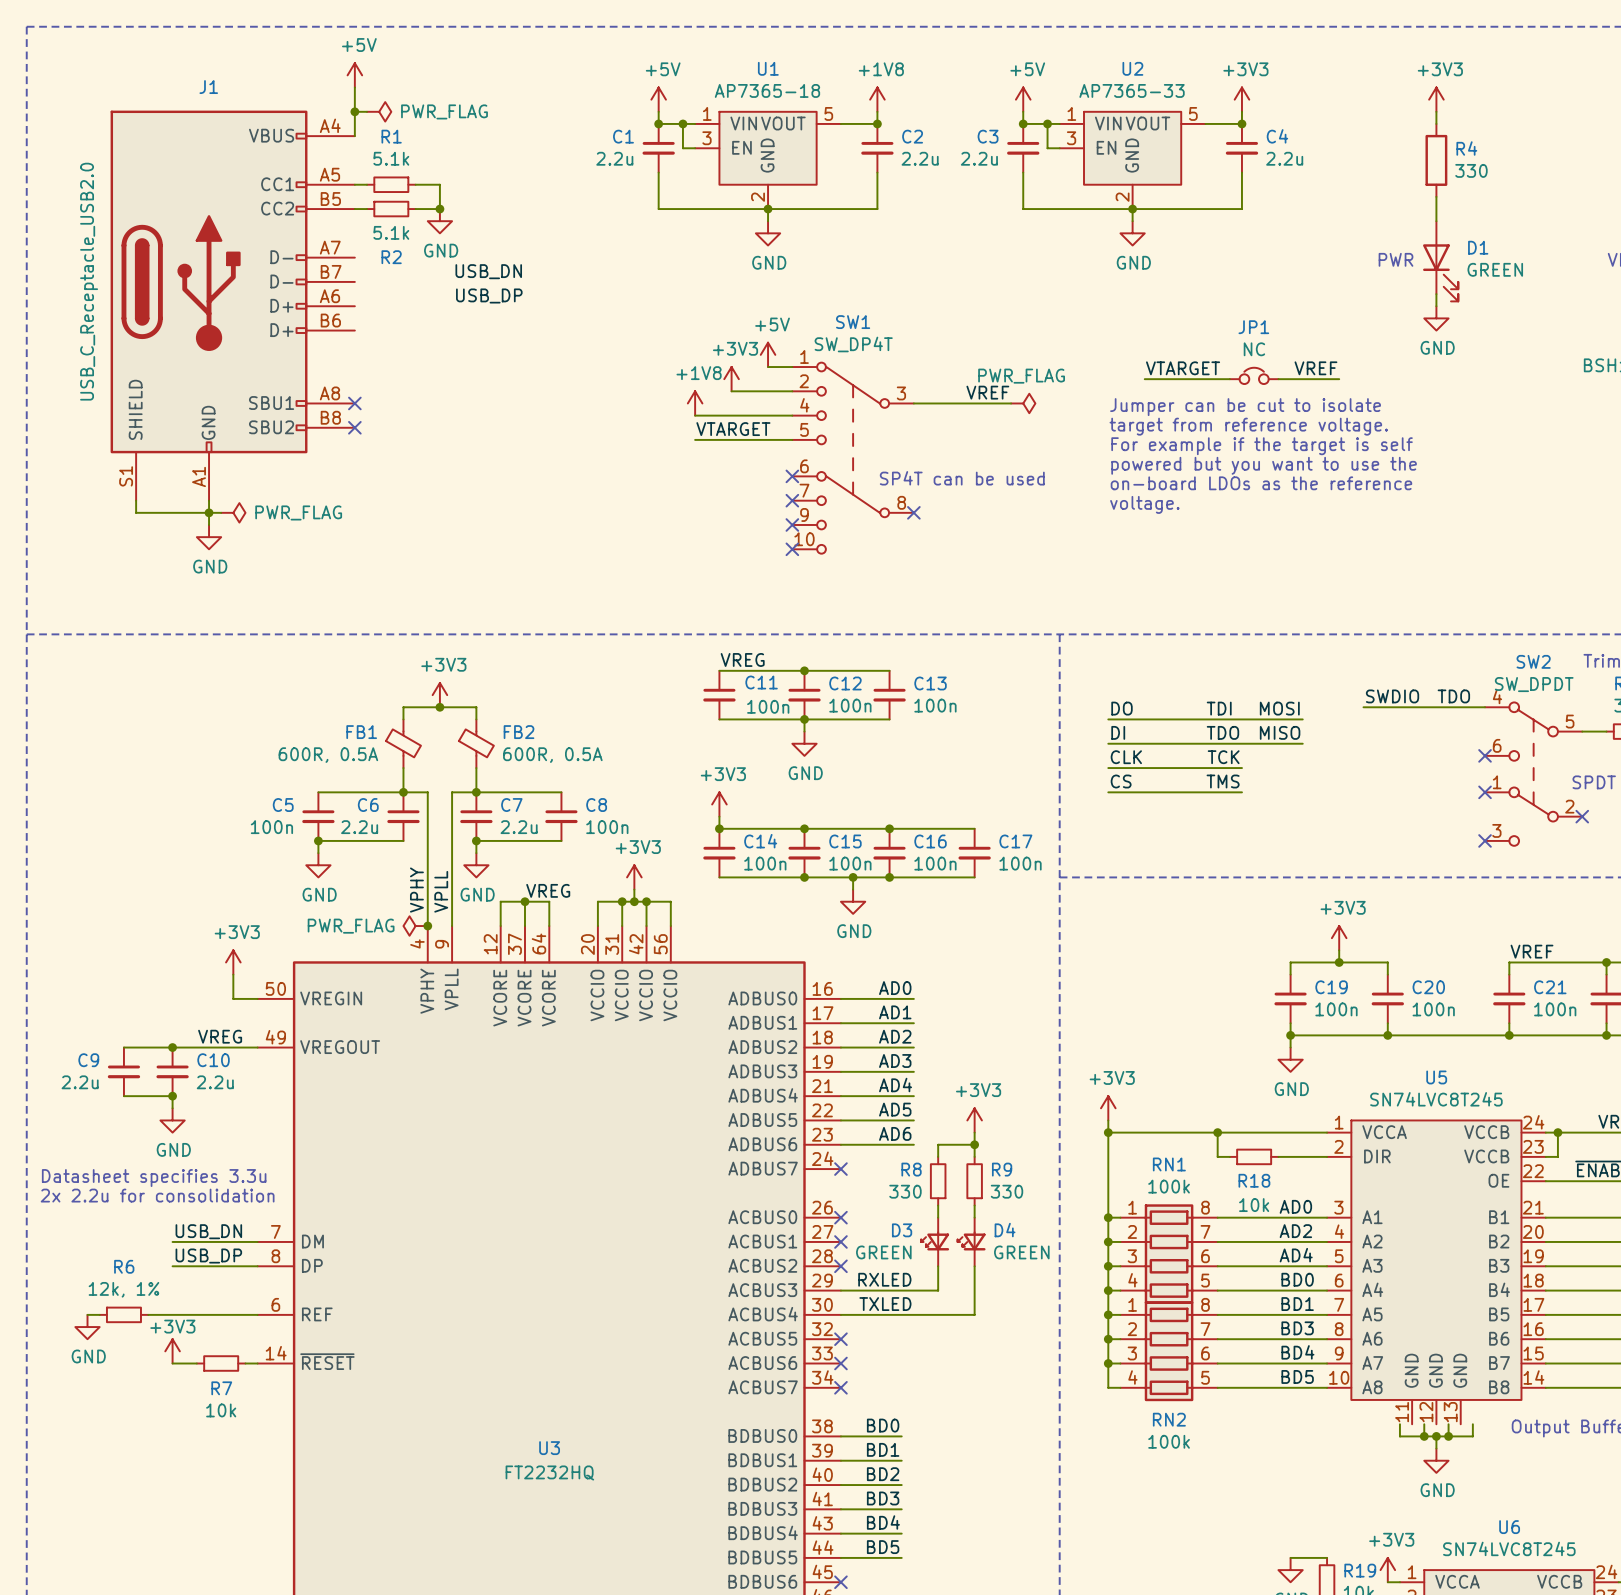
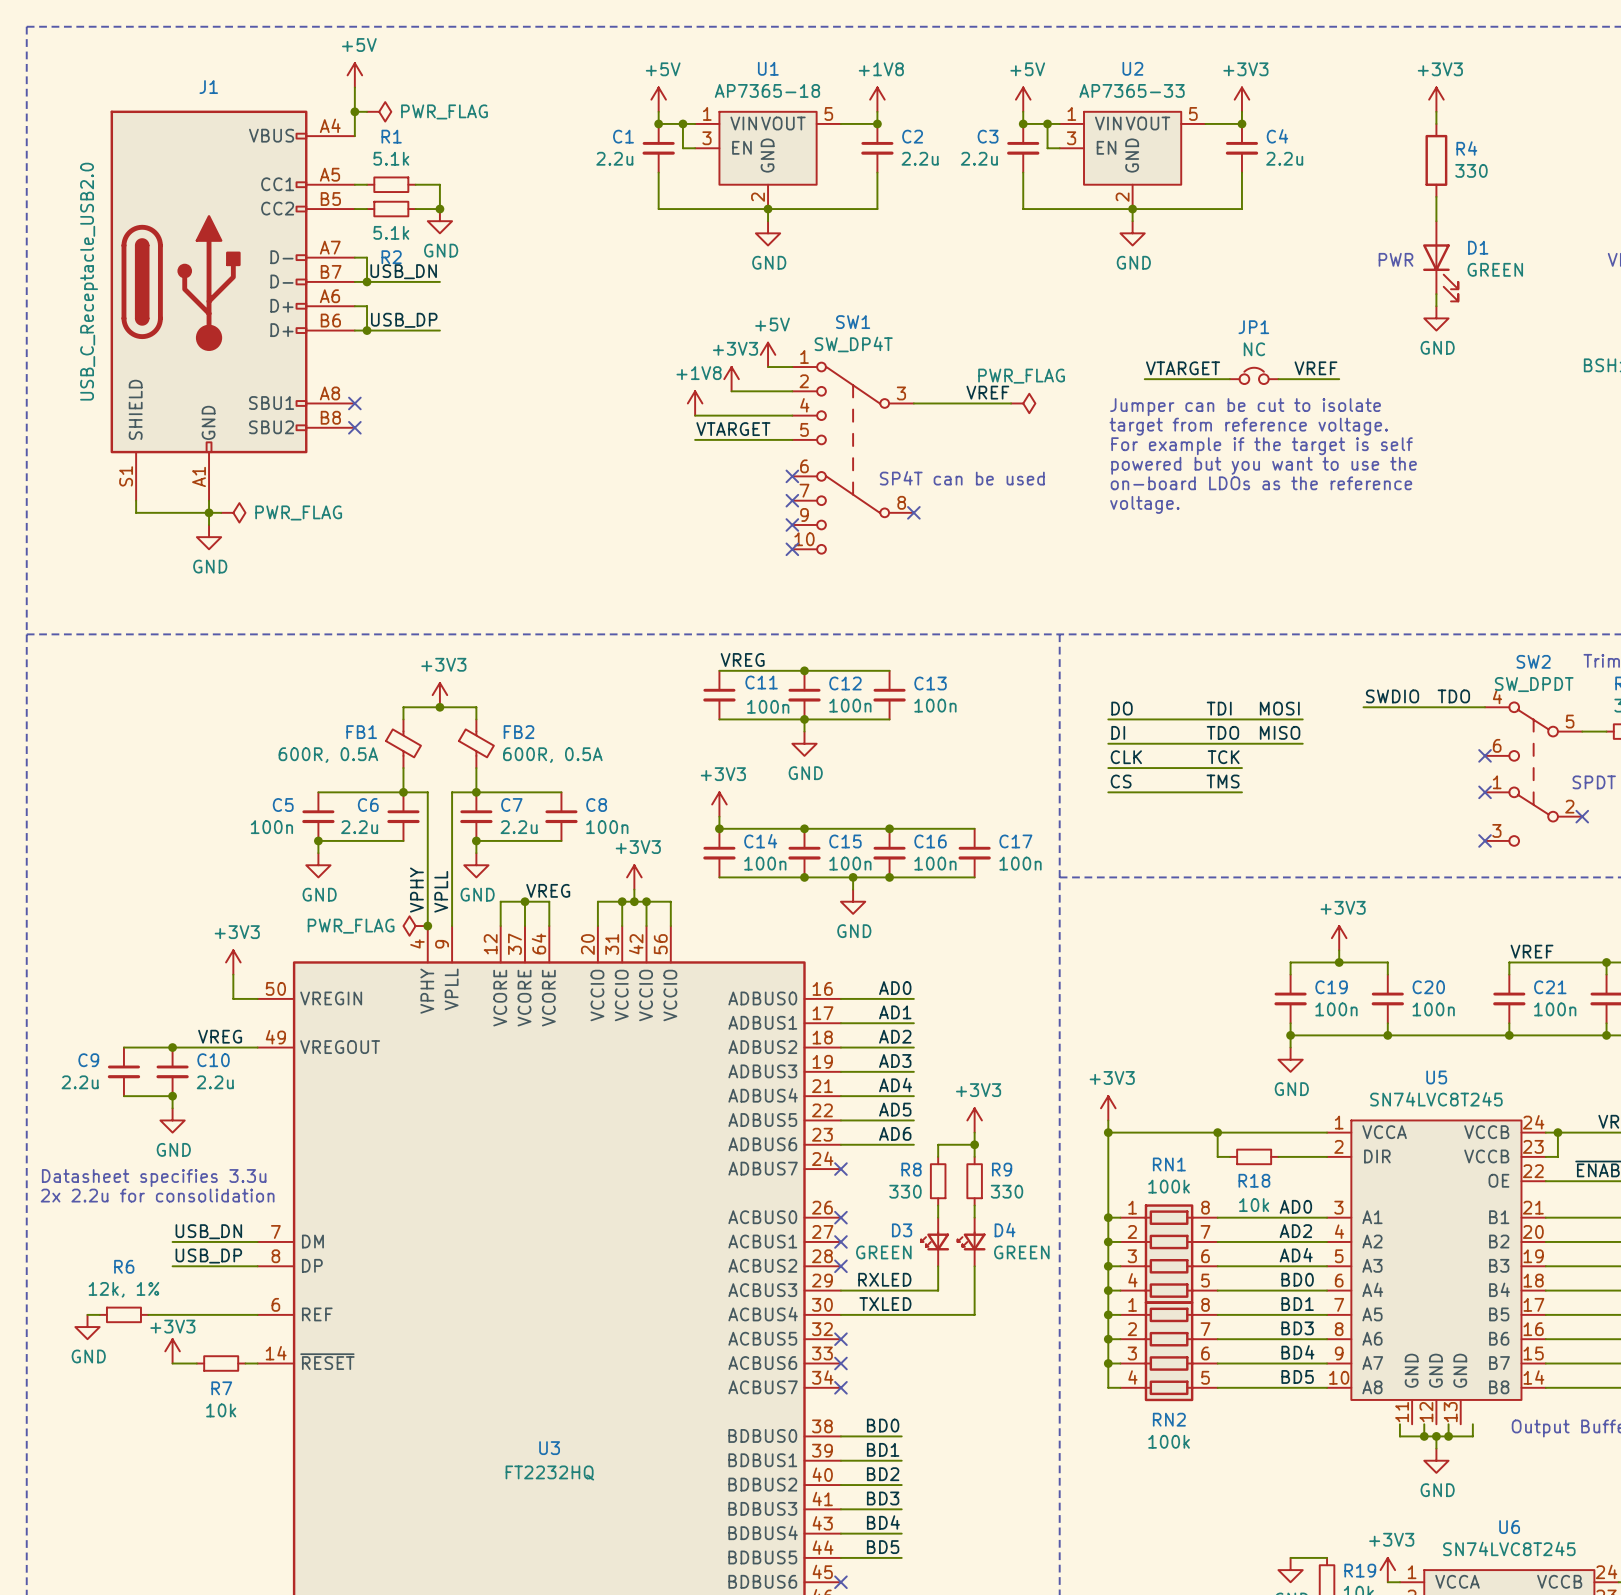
wire: none -> (354, 257) (367, 257) (367, 281)
label position: USB_DN (488, 271) -> USB_DN (403, 271)
wire: none -> (354, 281) (439, 281)
junction: none -> (367, 281)
label position: USB_DP (489, 295) -> USB_DP (404, 320)
wire: none -> (354, 306) (367, 306) (367, 330)
wire: none -> (354, 330) (439, 330)
junction: none -> (367, 330)

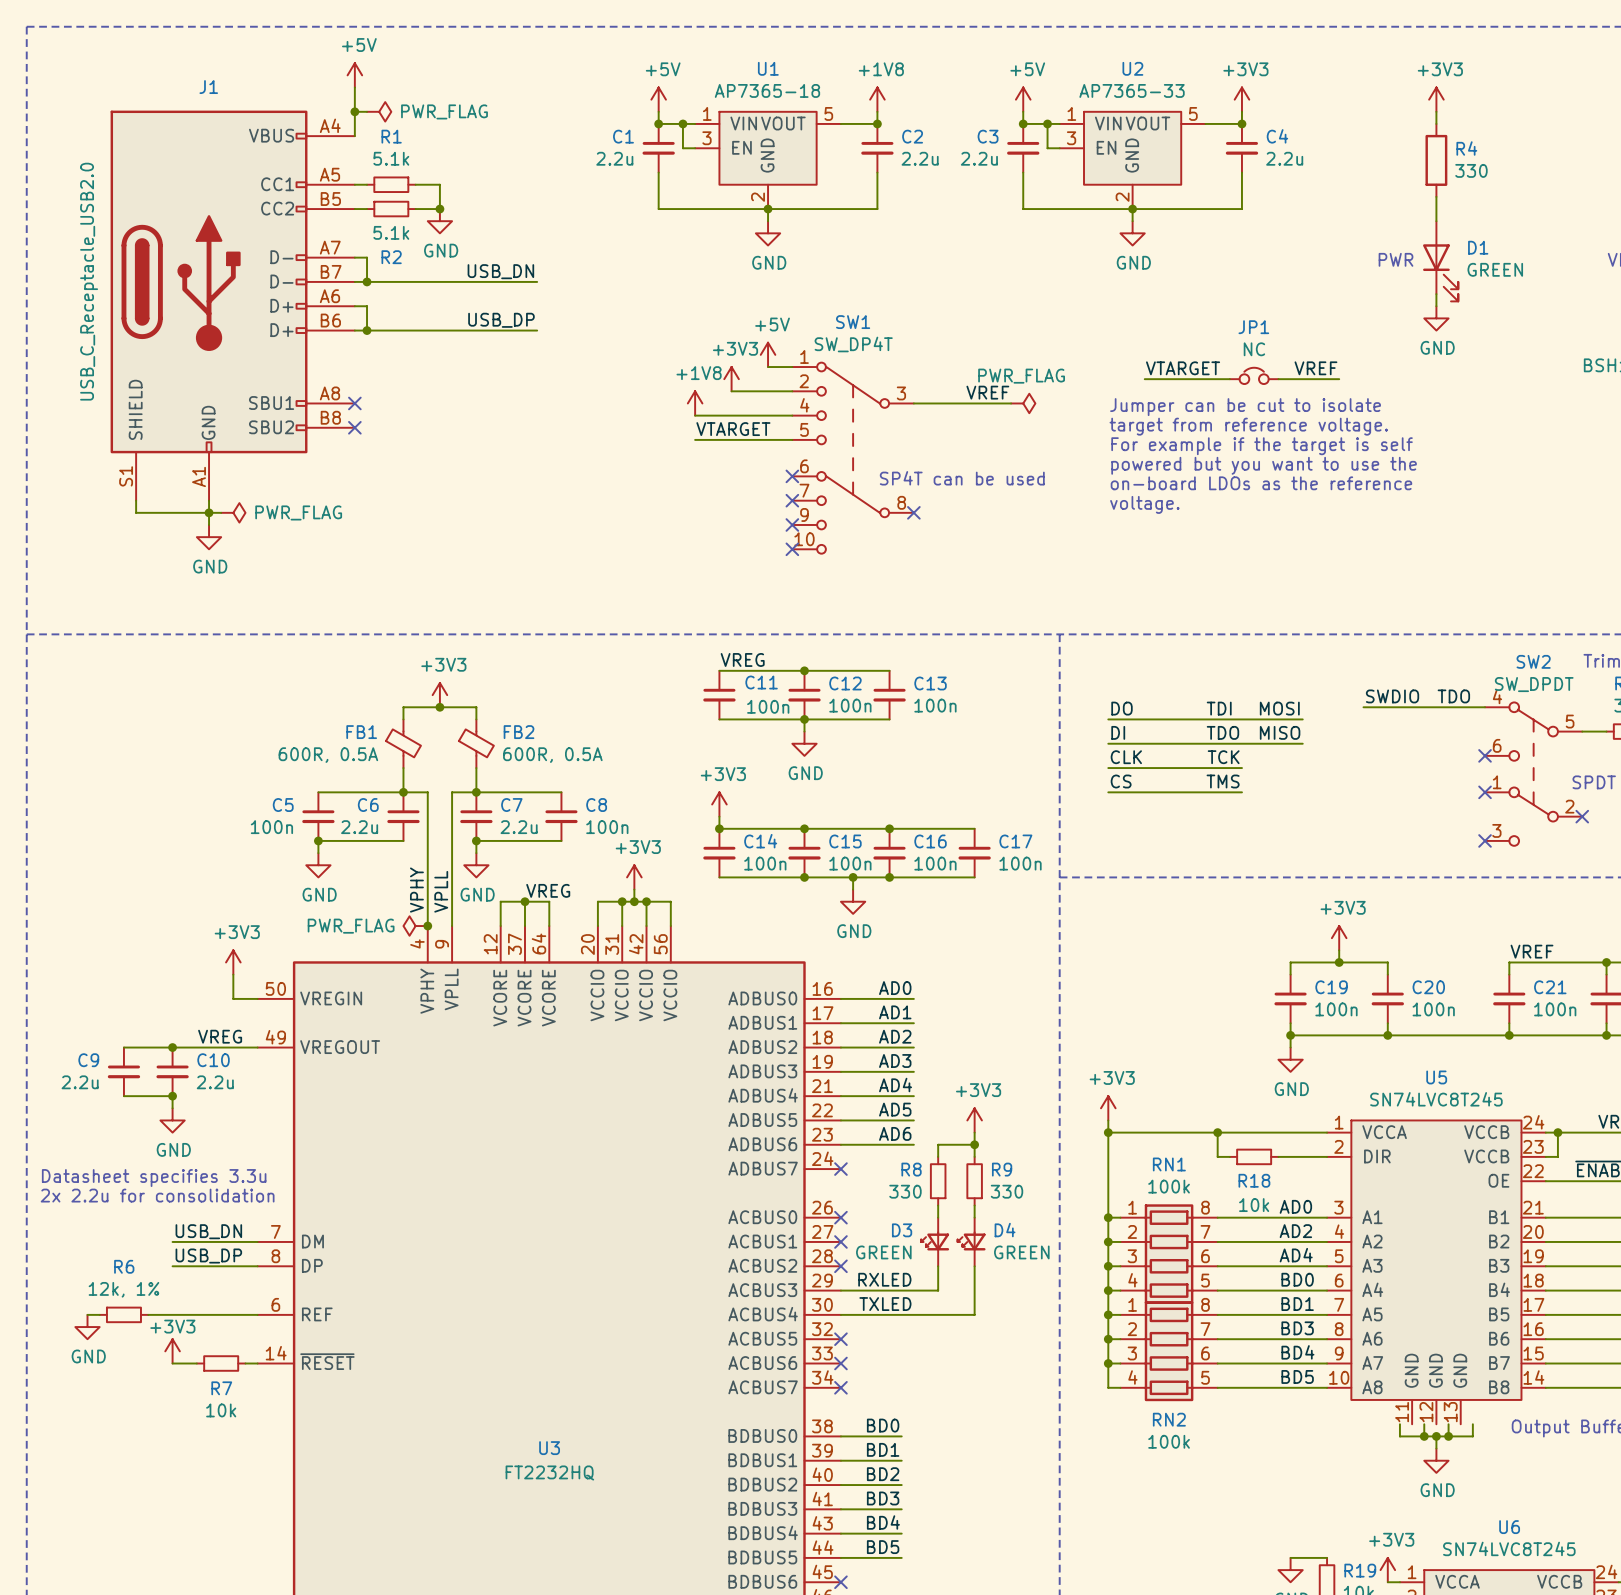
label position: USB_DN (403, 271) -> USB_DN (500, 271)
wire: none -> (439, 281) (537, 281)
label position: USB_DP (404, 320) -> USB_DP (501, 320)
wire: none -> (439, 330) (537, 330)

